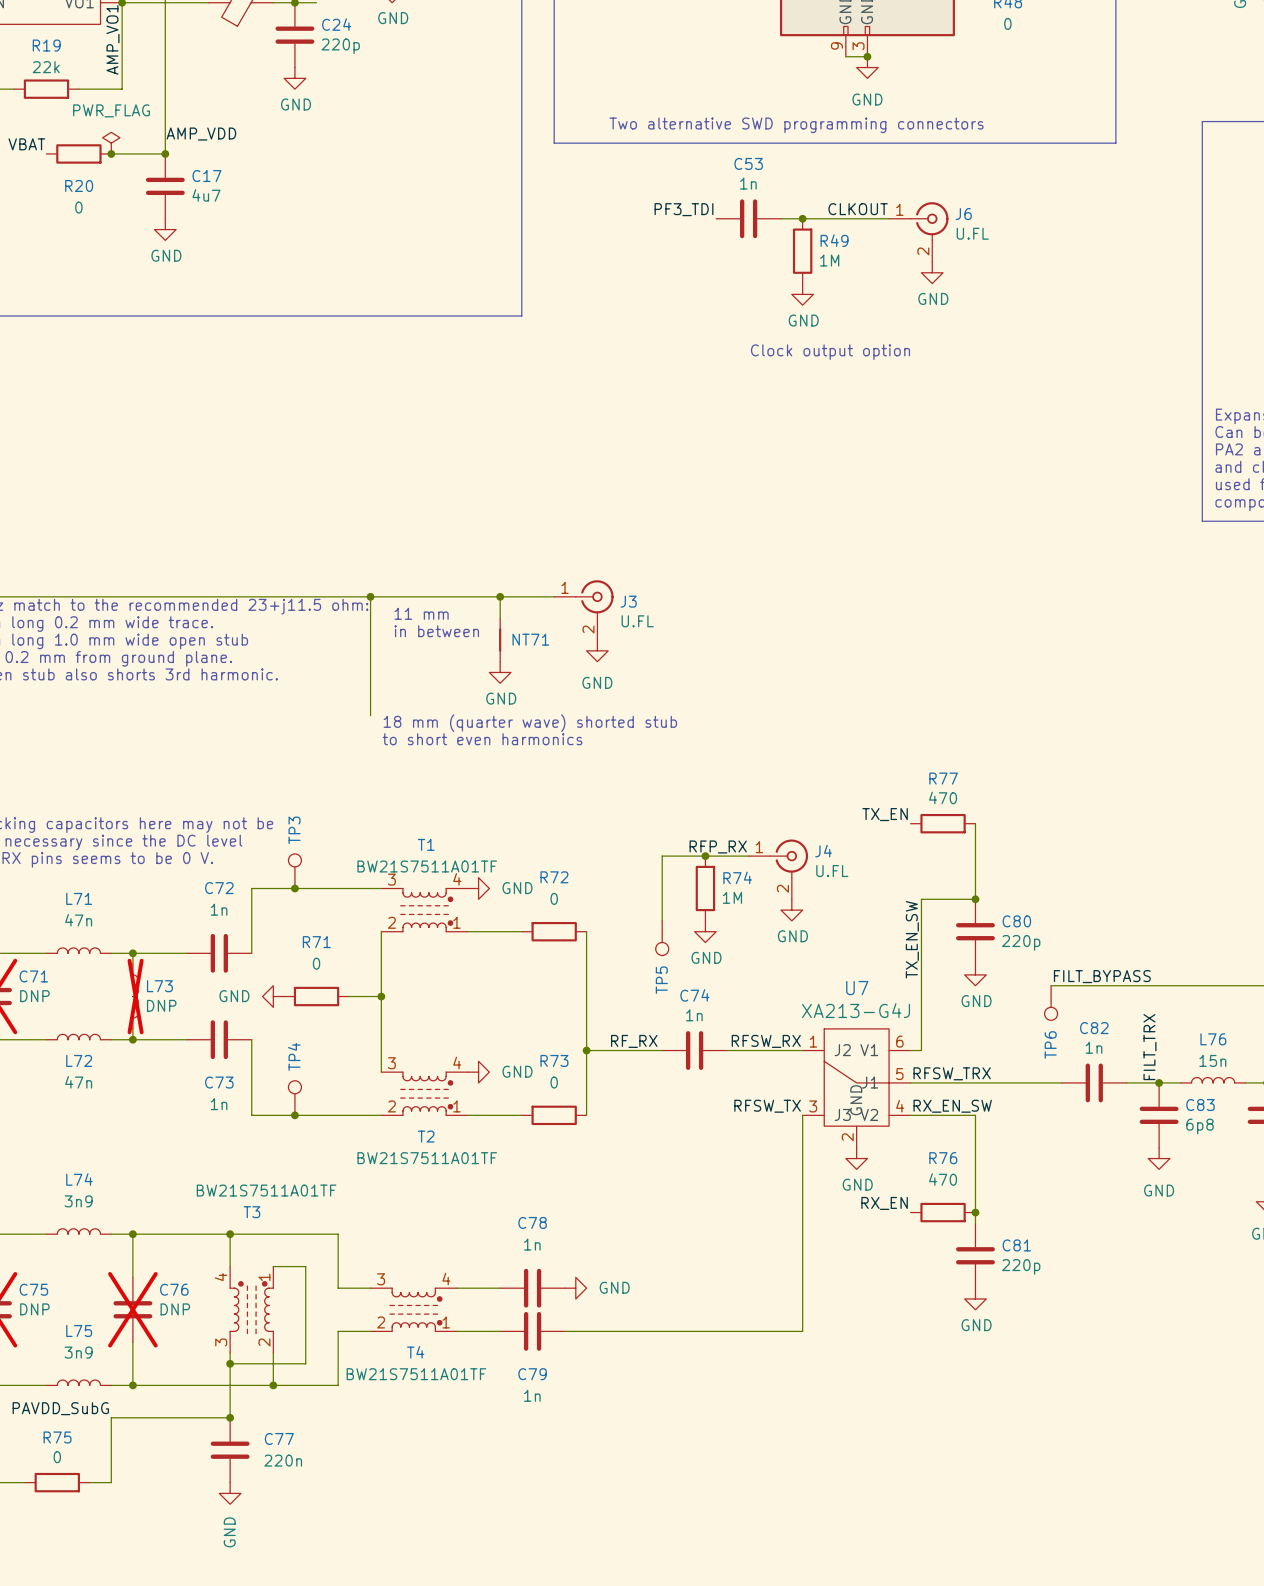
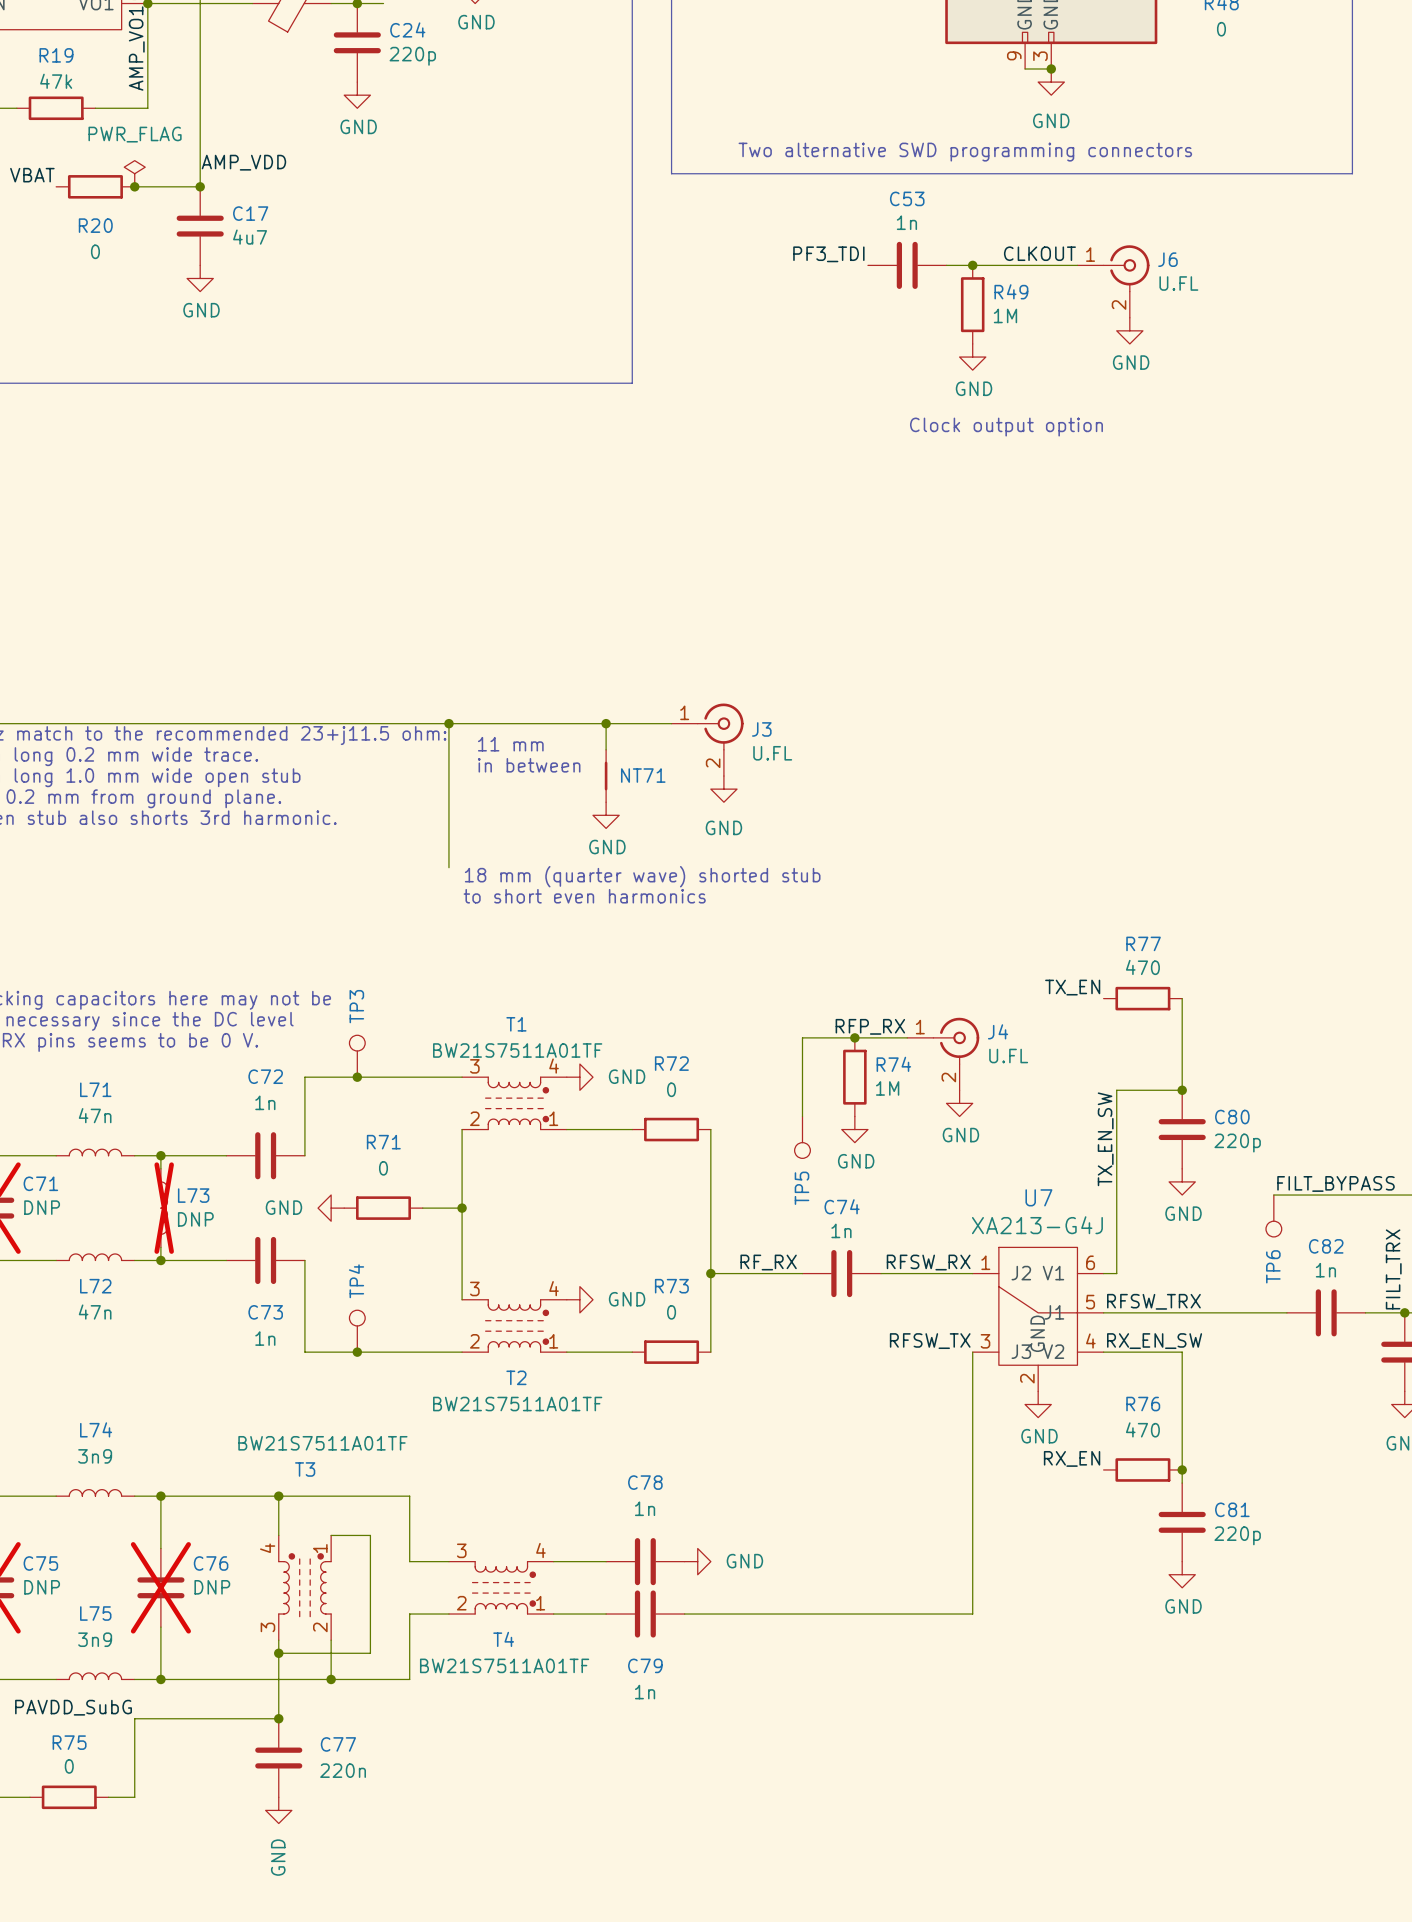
R19 value: 22k (46, 67) -> 47k (56, 81)

